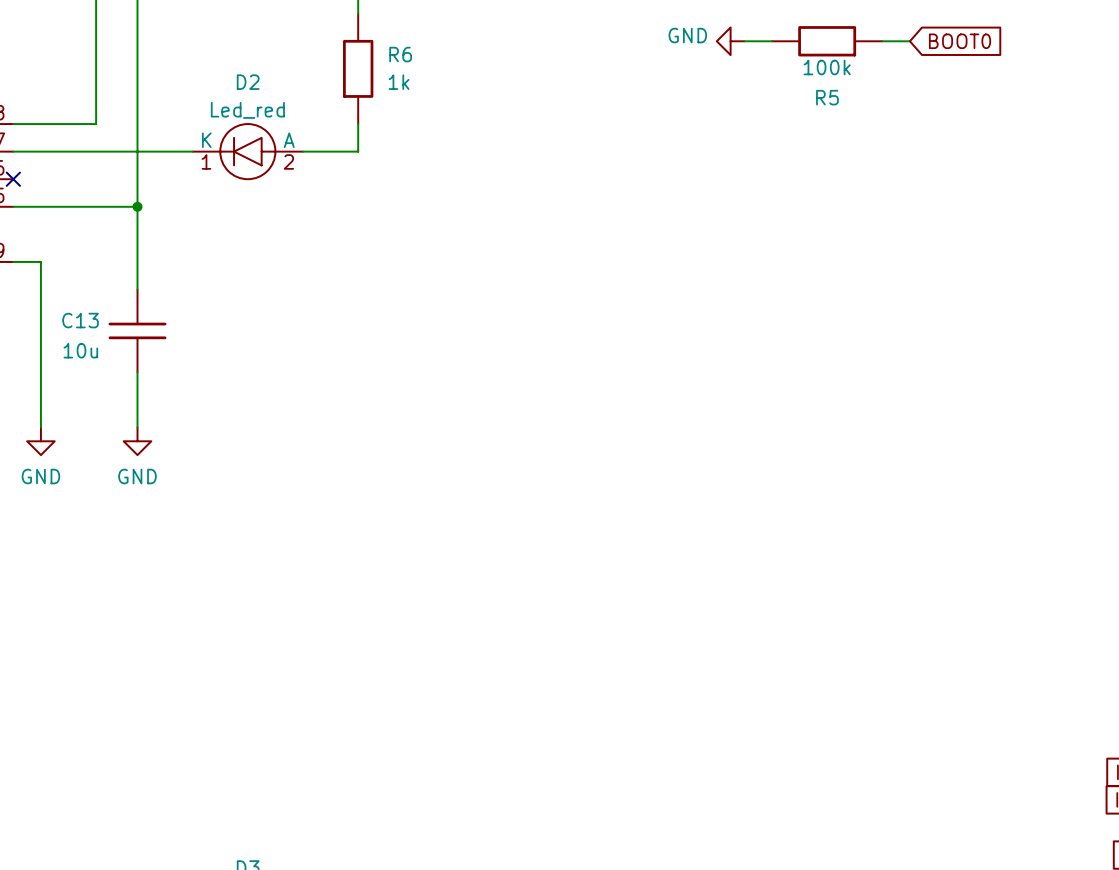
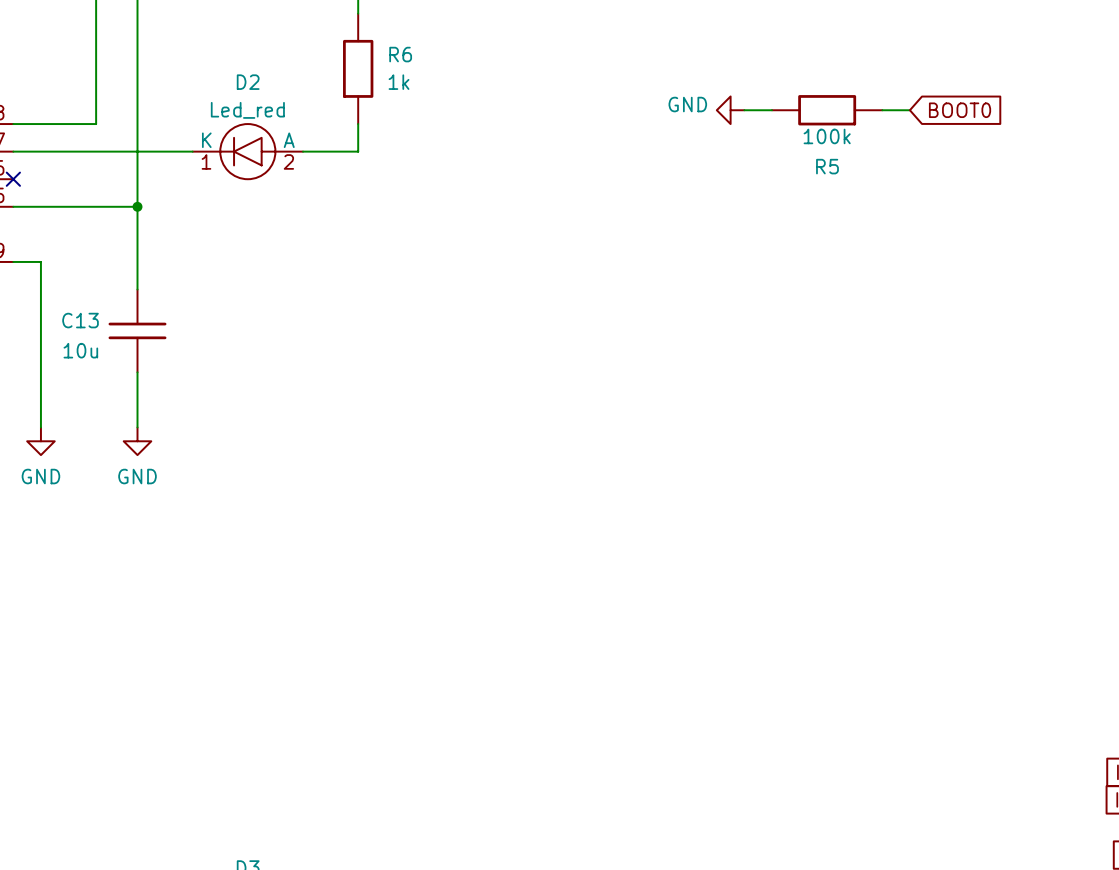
power symbol position: GND (730, 41) -> GND (730, 110)
wire: (744, 41) (771, 41) -> (744, 110) (771, 110)
R5 position: (827, 41) -> (827, 110)
wire: (882, 41) (909, 41) -> (882, 110) (909, 110)
global label position: BOOT0 (960, 41) -> BOOT0 (960, 110)

